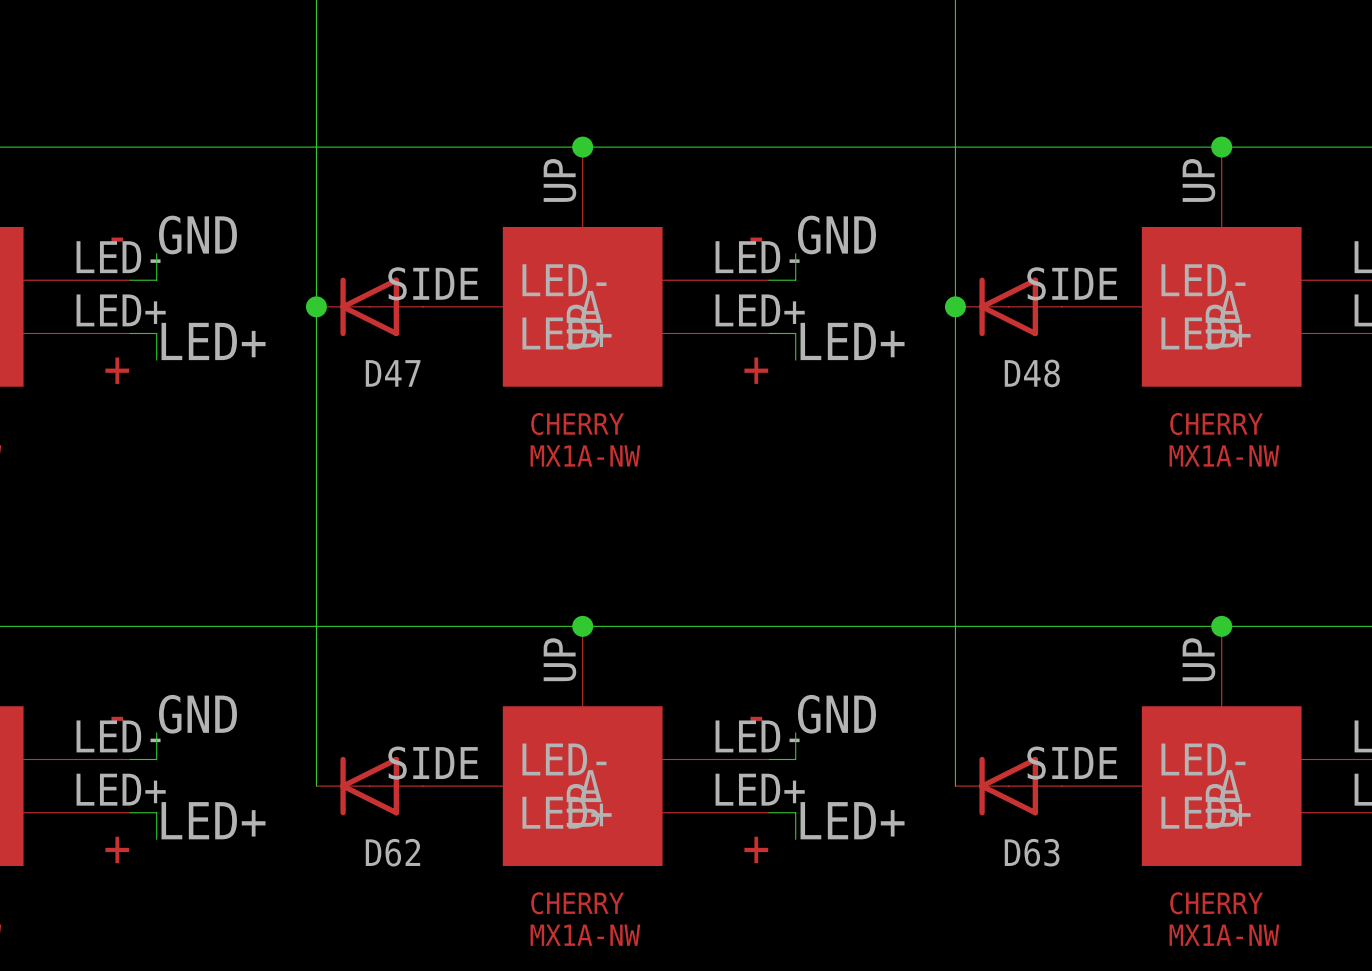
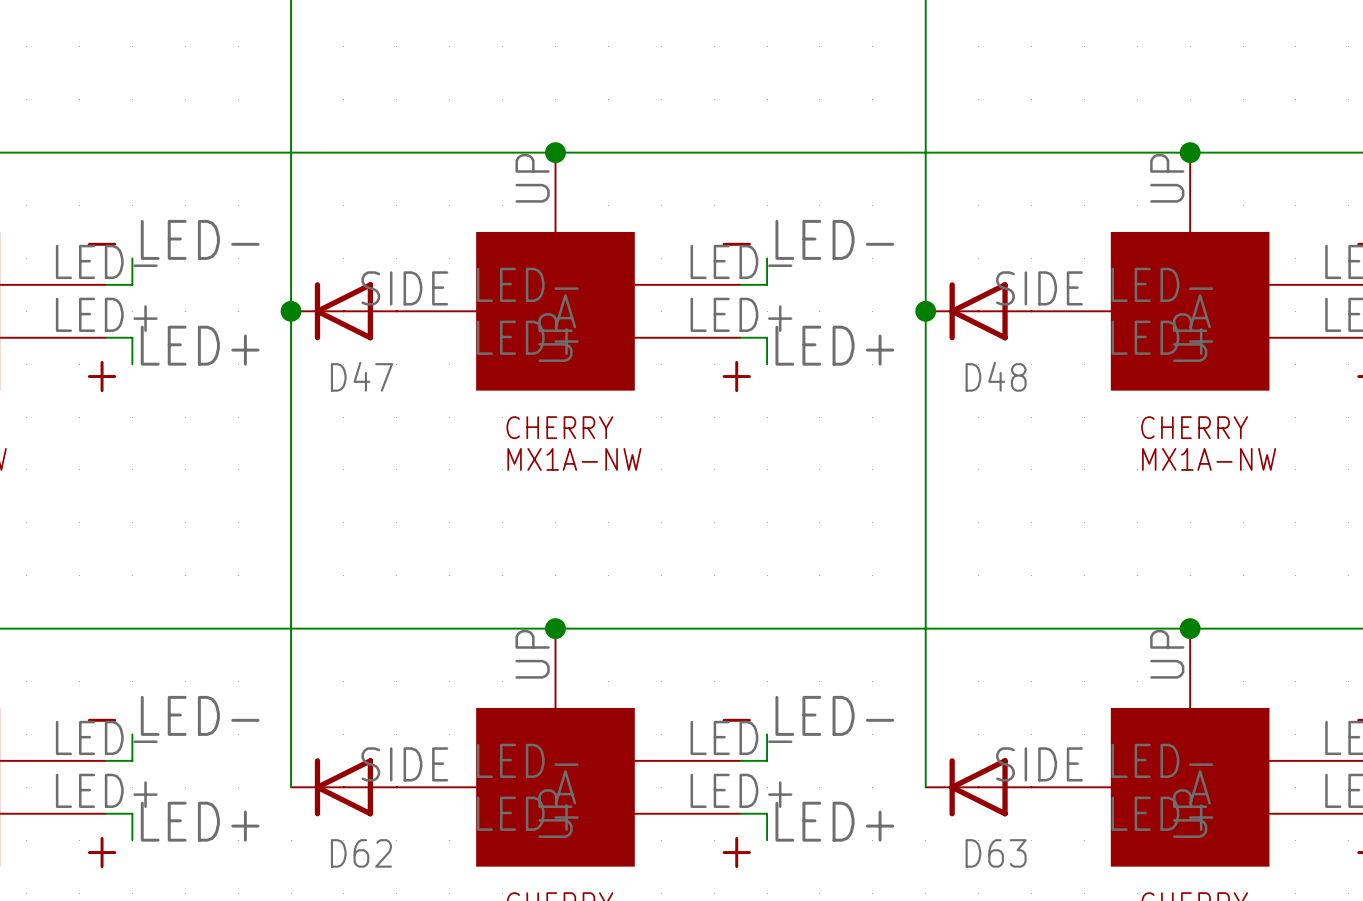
label: GND (197, 234) -> LED- (200, 239)
label: GND (836, 234) -> LED- (834, 239)
label: GND (197, 714) -> LED- (200, 715)
label: GND (836, 714) -> LED- (834, 715)

